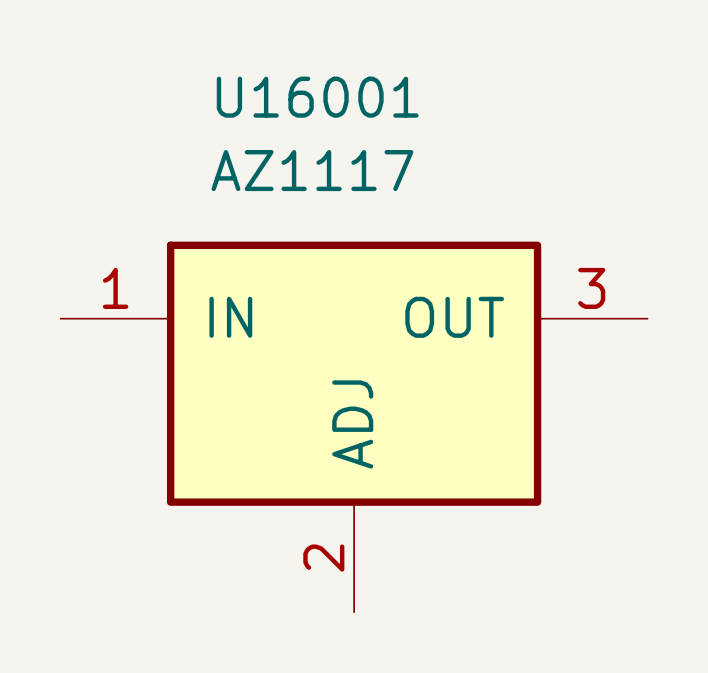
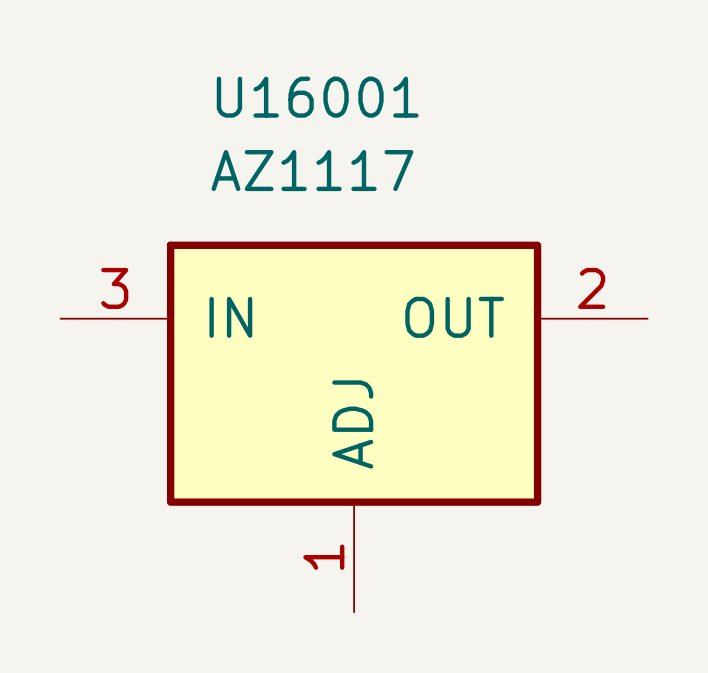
U16001 pin number: 1 (115, 288) -> 3 (114, 288)
U16001 pin number: 3 (591, 288) -> 2 (591, 288)
U16001 pin number: 2 (323, 558) -> 1 (323, 557)

